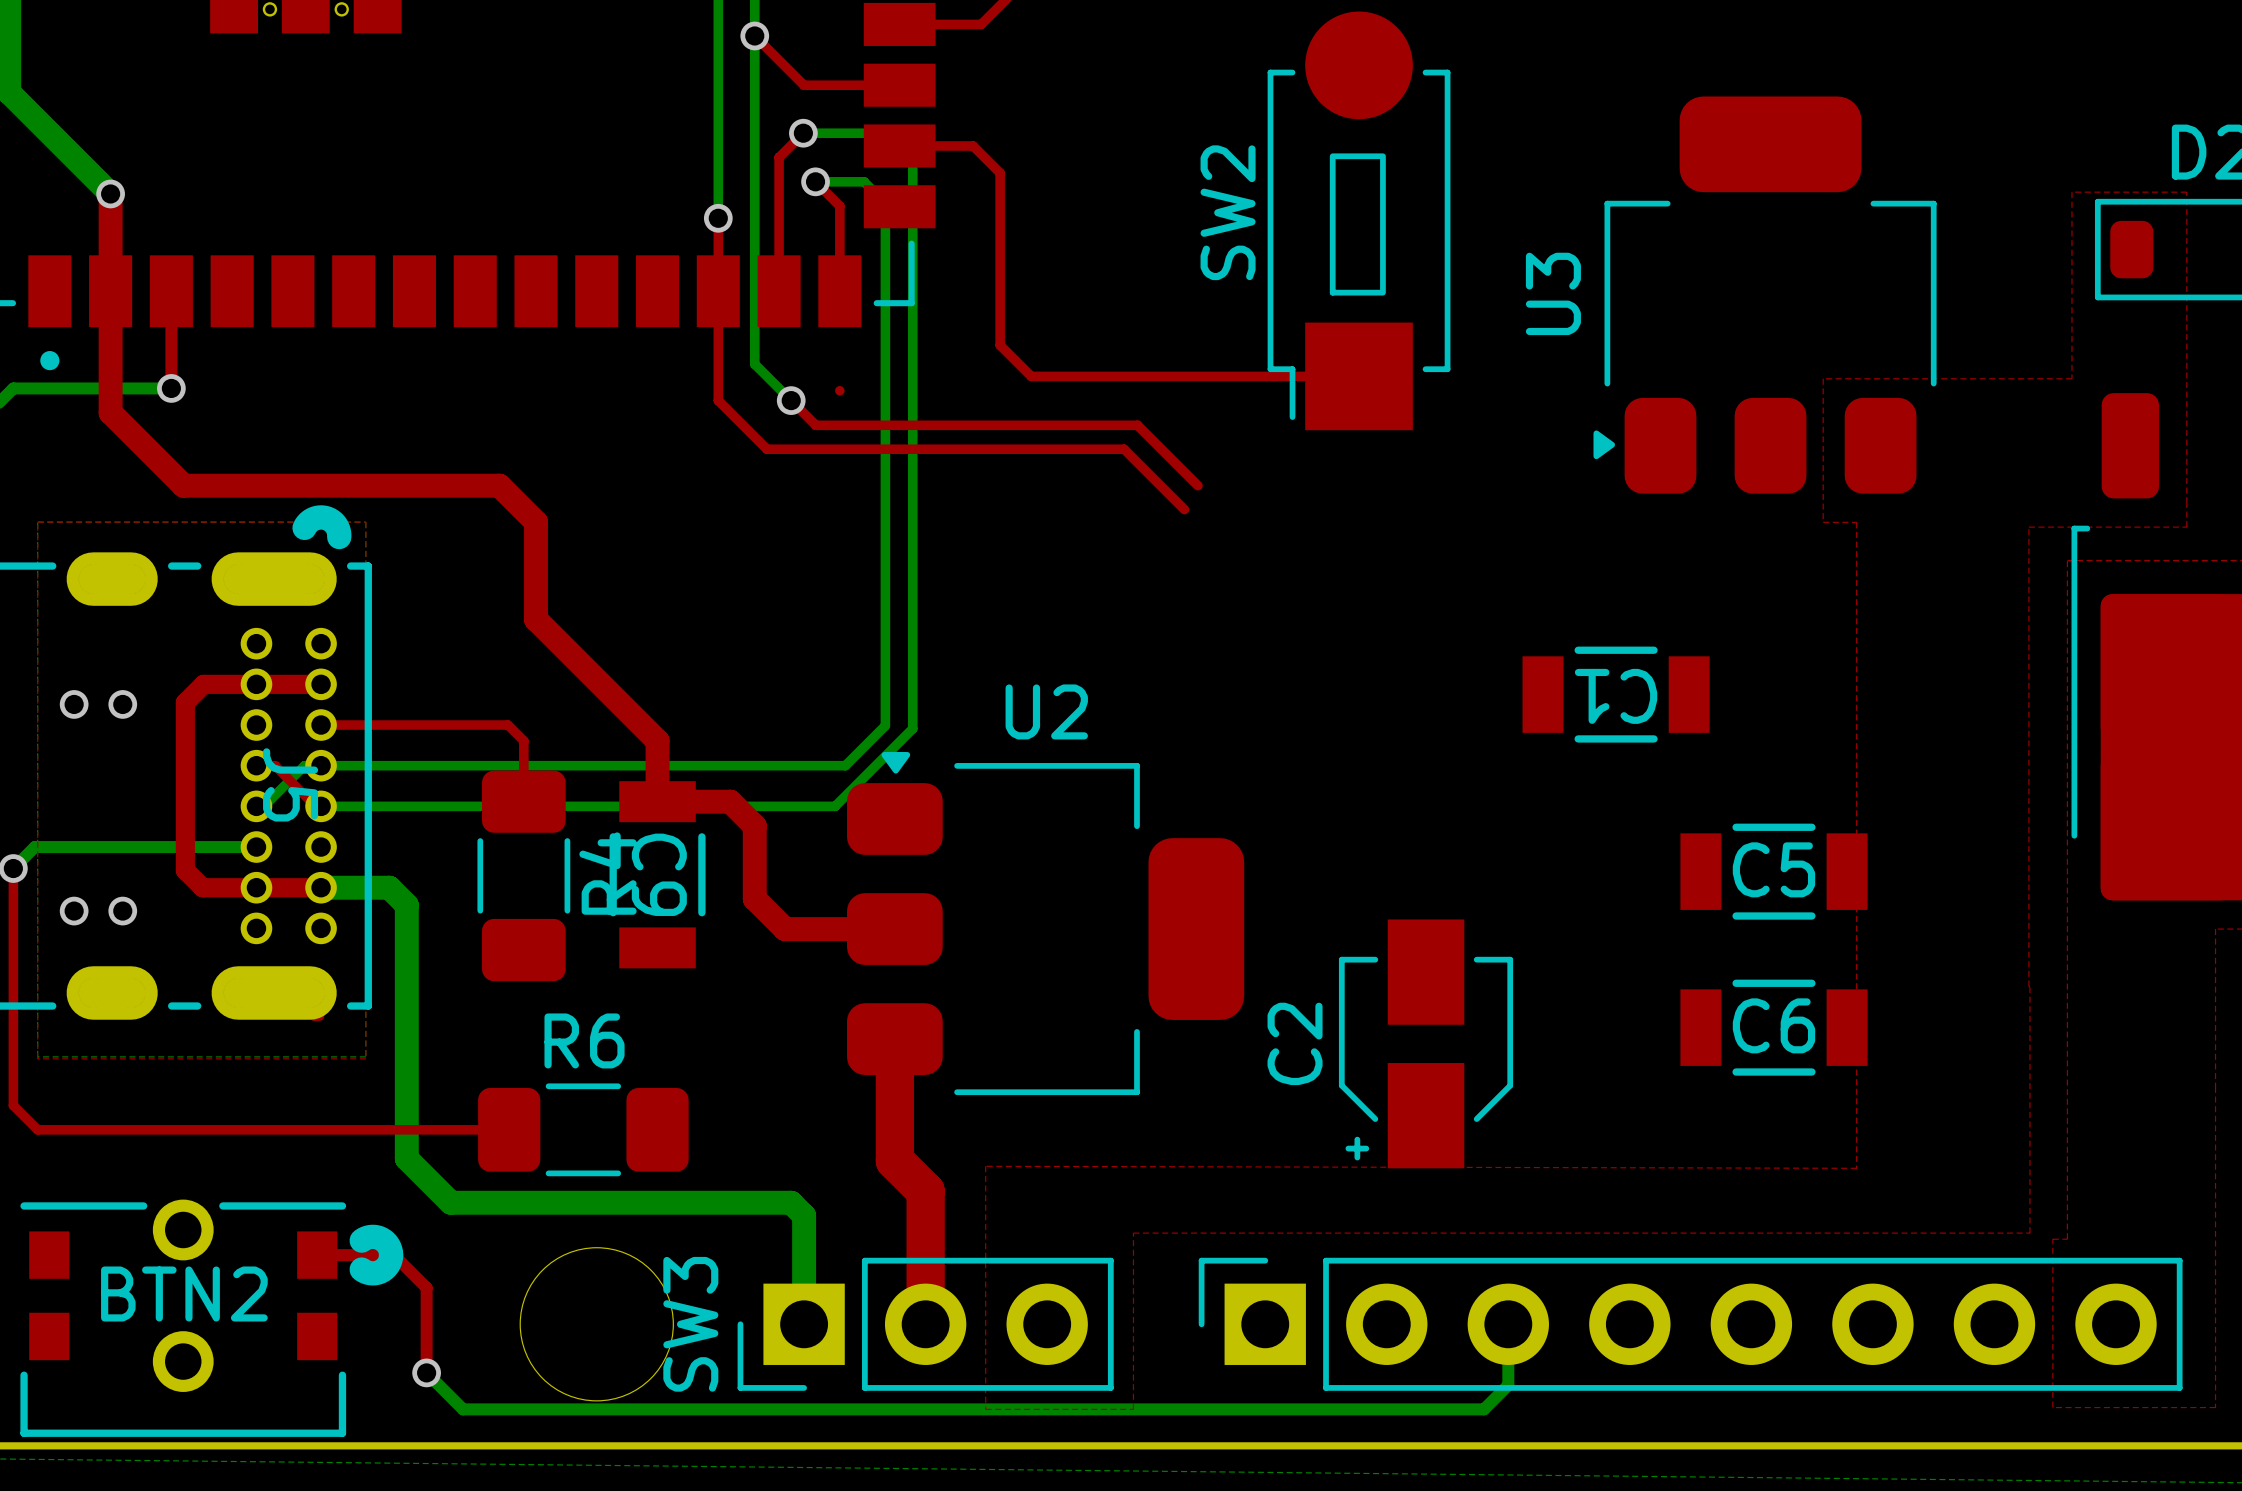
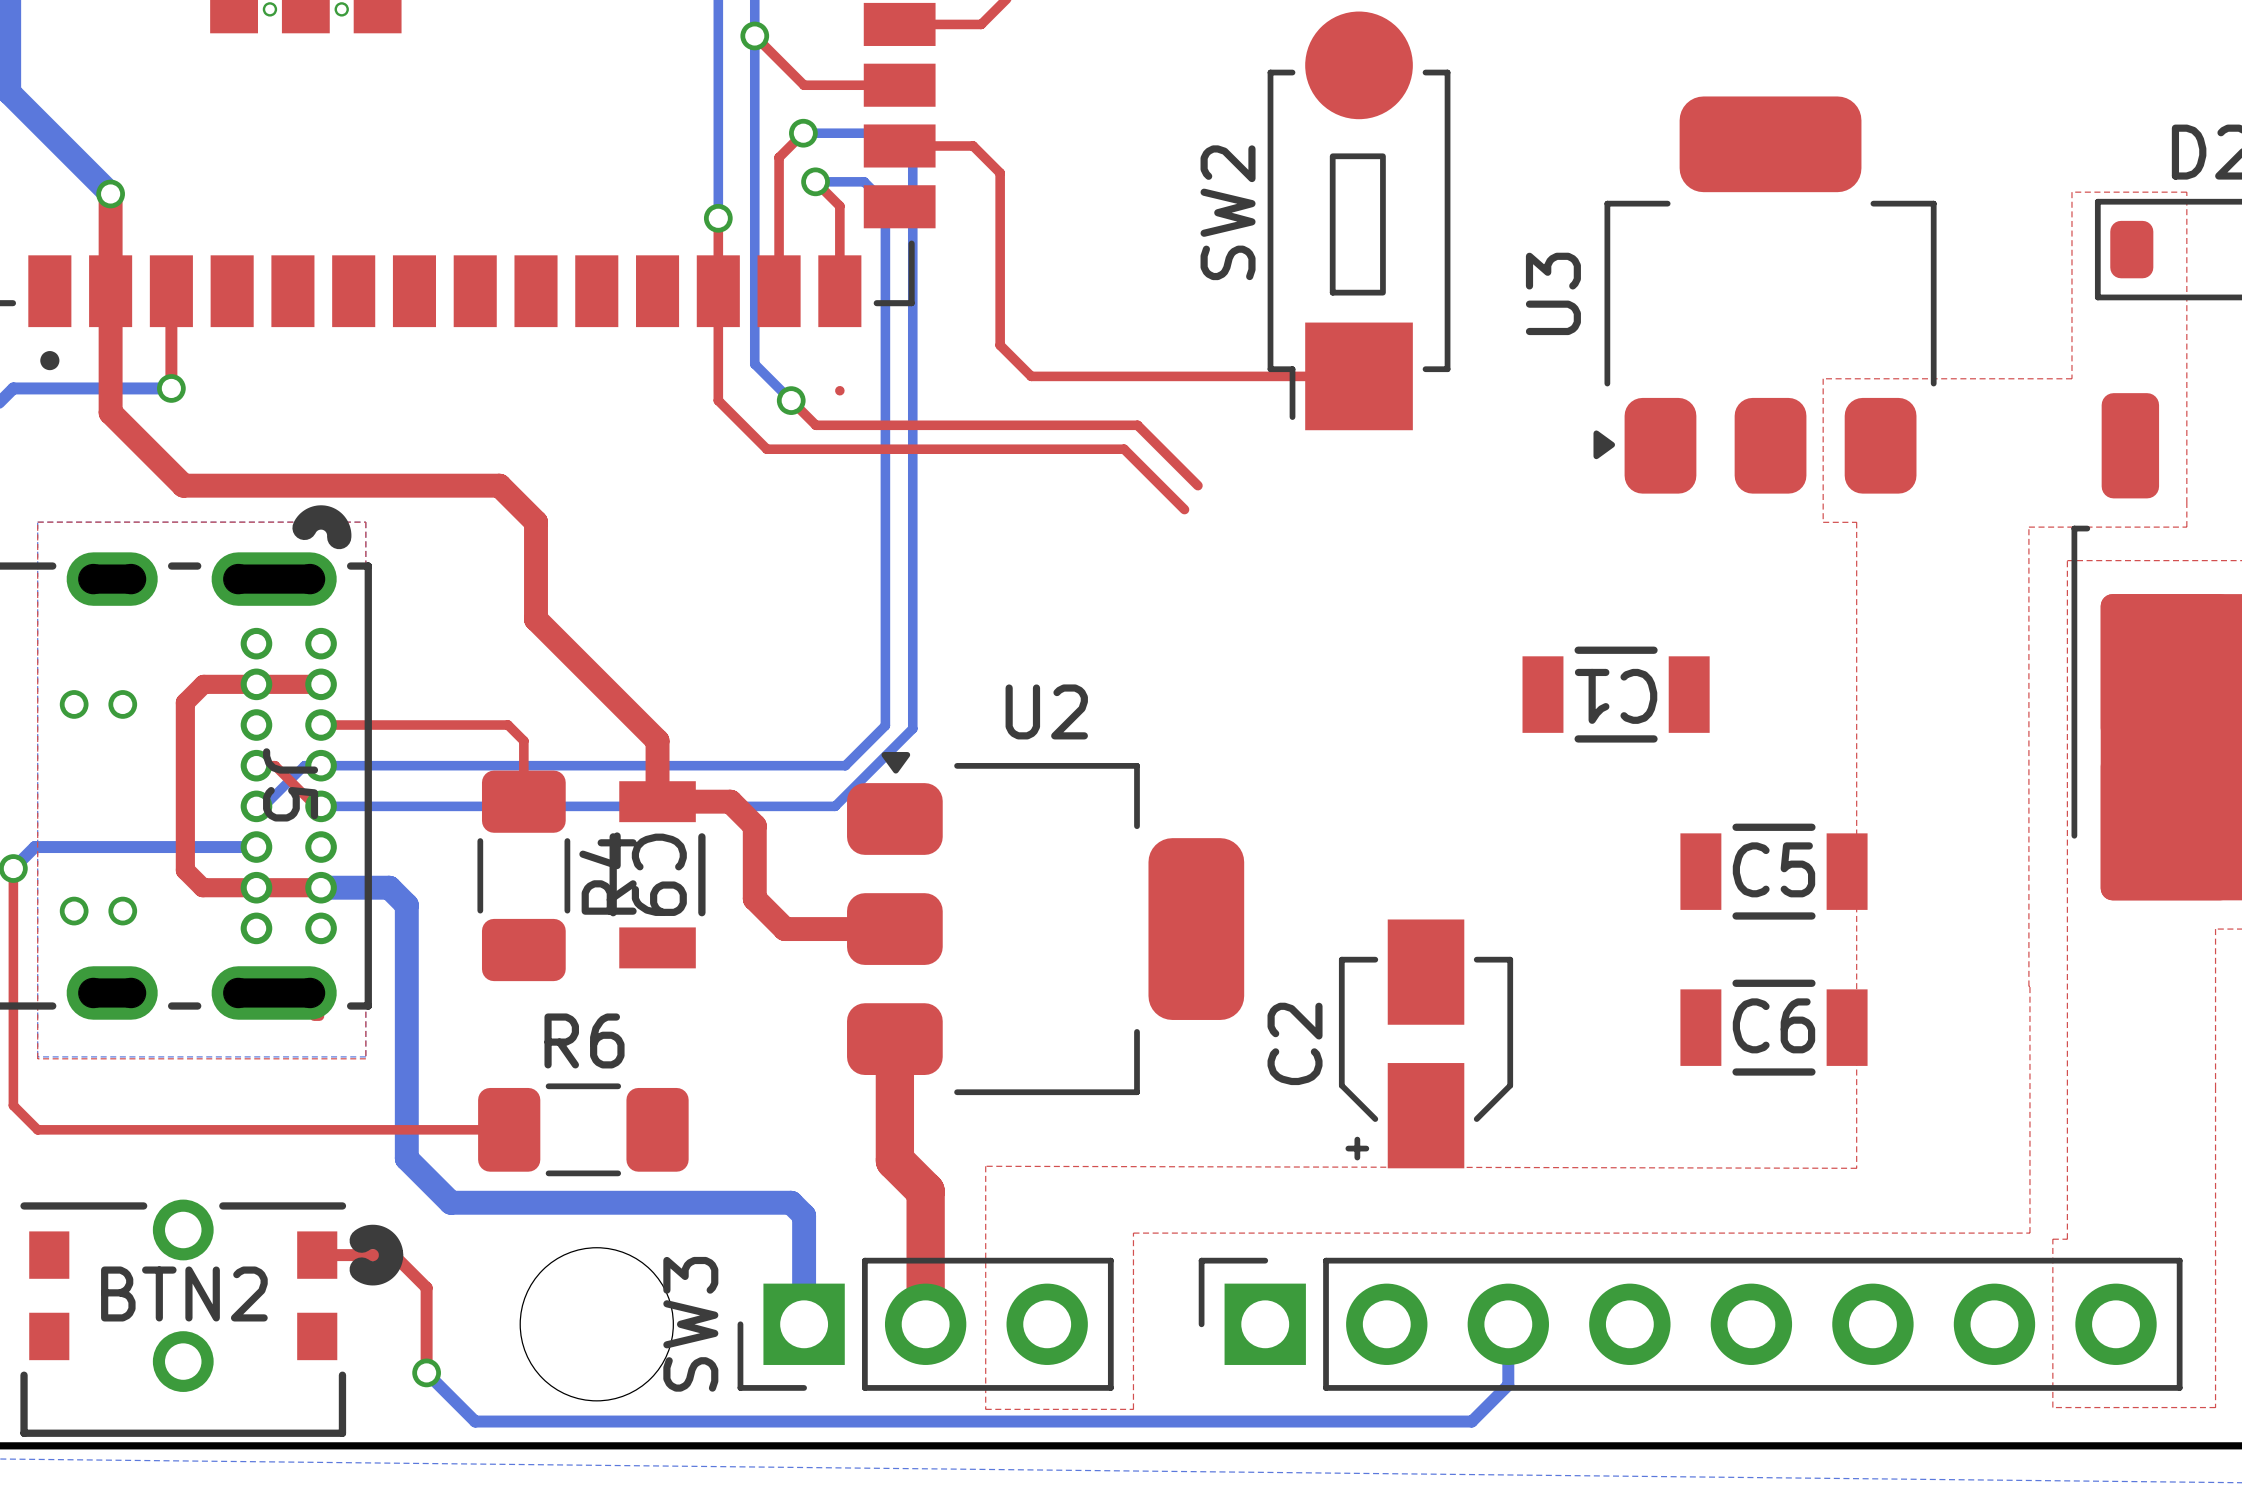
bottom track: (463, 1409) (1484, 1409) -> (463, 1409) (475, 1421) (1471, 1421) (1484, 1409)

